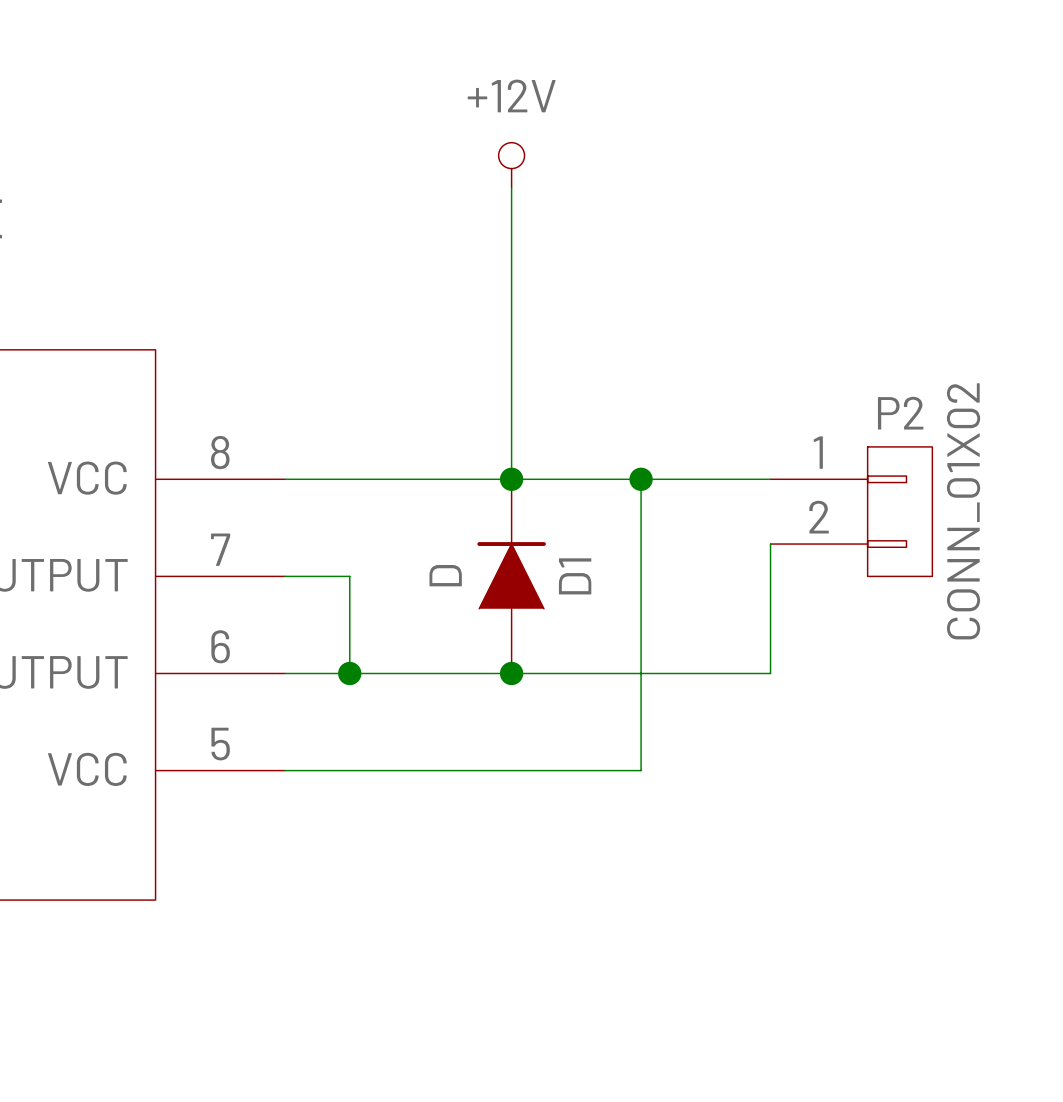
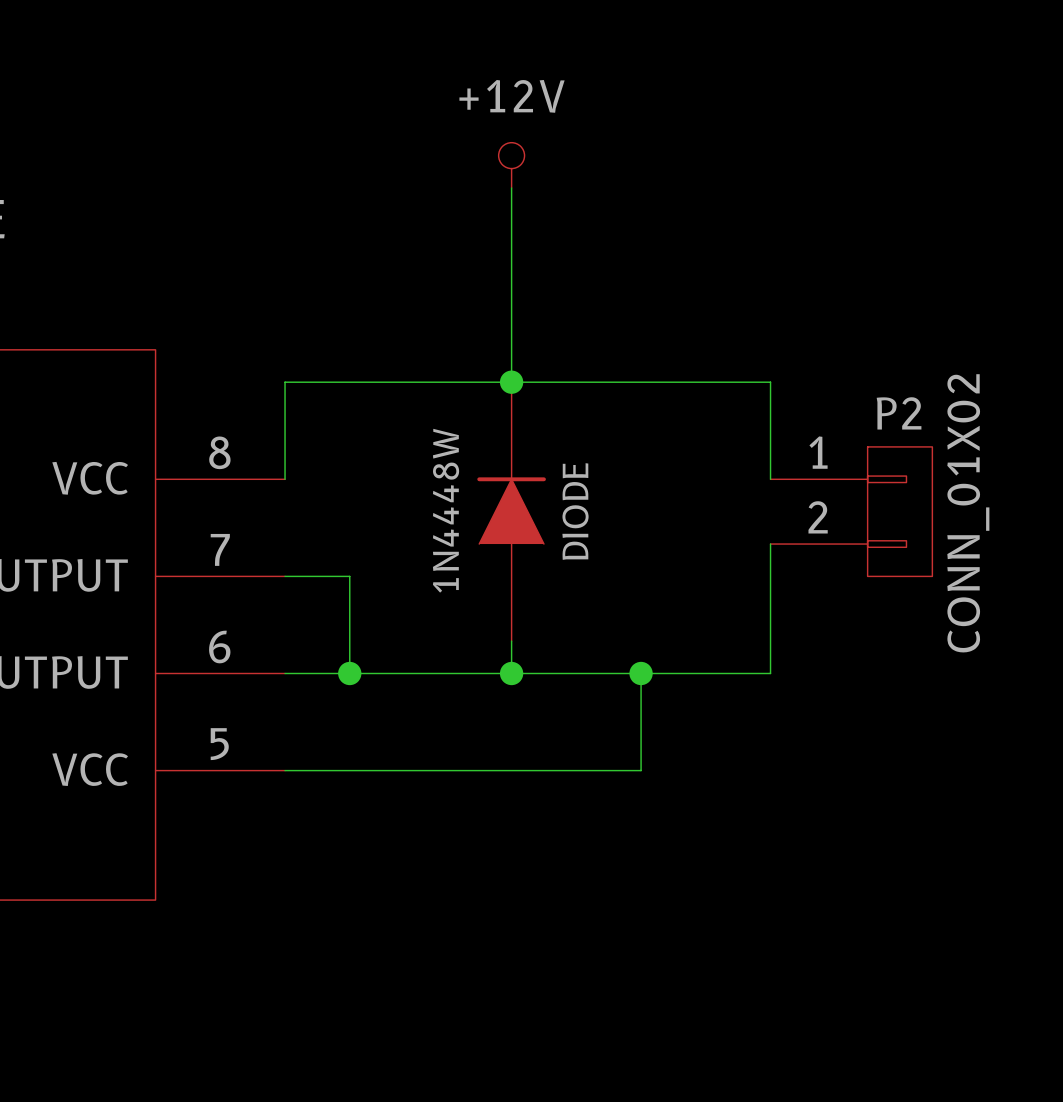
junction: none -> (511, 382)
wire: (285, 479) (770, 479) -> (285, 479) (285, 382) (770, 382) (770, 479)
junction: (511, 479) -> none
wire: (641, 479) (641, 673) -> none
junction: (641, 479) -> none
1N4448W: none -> DIODE (511, 511)
D1: D (511, 576) -> none
junction: none -> (641, 673)

